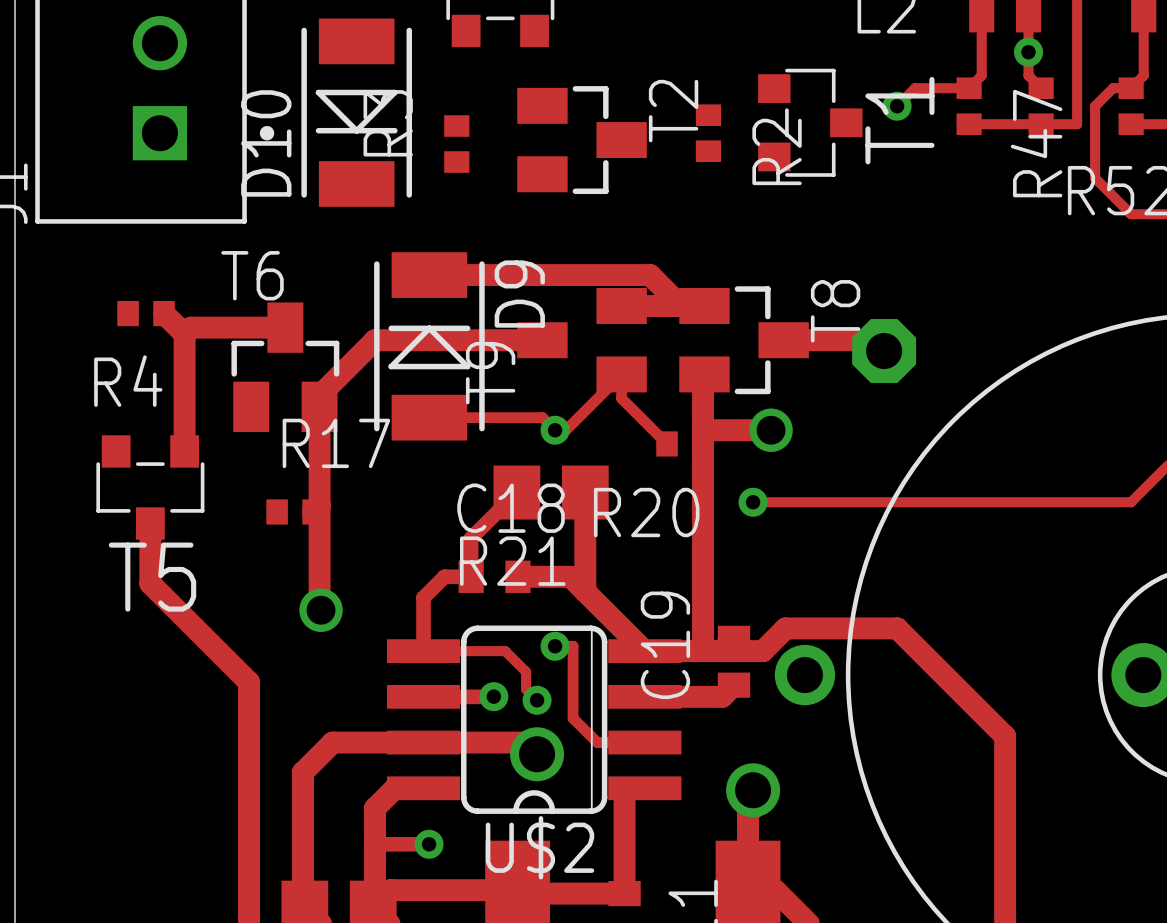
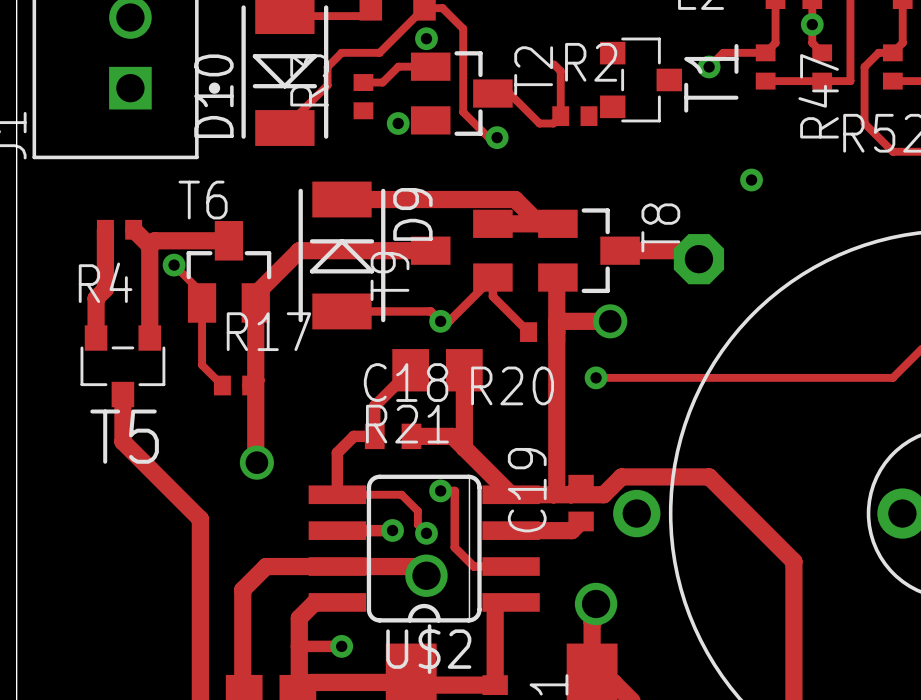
track: none -> (370, 7) (362, 16) (284, 16)
track: none -> (424, 7) (379, 52) (341, 52) (327, 66) (327, 85) (284, 128)
track: none -> (424, 8) (442, 8) (463, 28) (463, 112) (488, 137) (497, 137)
via: none -> (426, 38)
track: none -> (553, 64) (560, 71) (560, 116) (553, 123) (539, 123) (509, 93) (492, 93)
track: none -> (430, 66) (398, 66) (382, 82) (363, 82)
R2 rotation: 0° (708, 133) -> 90° clockwise (574, 116)
R2 position: (708, 133) -> (574, 116)
R2 name position: R2 (777, 151) -> R2 (591, 62)
via: none -> (398, 123)
via: none -> (497, 137)
via: none -> (751, 180)
track: none -> (105, 229) (105, 289) (96, 298) (96, 338)
track: none -> (174, 265) (202, 293) (202, 365) (222, 385)
via: none -> (174, 265)

